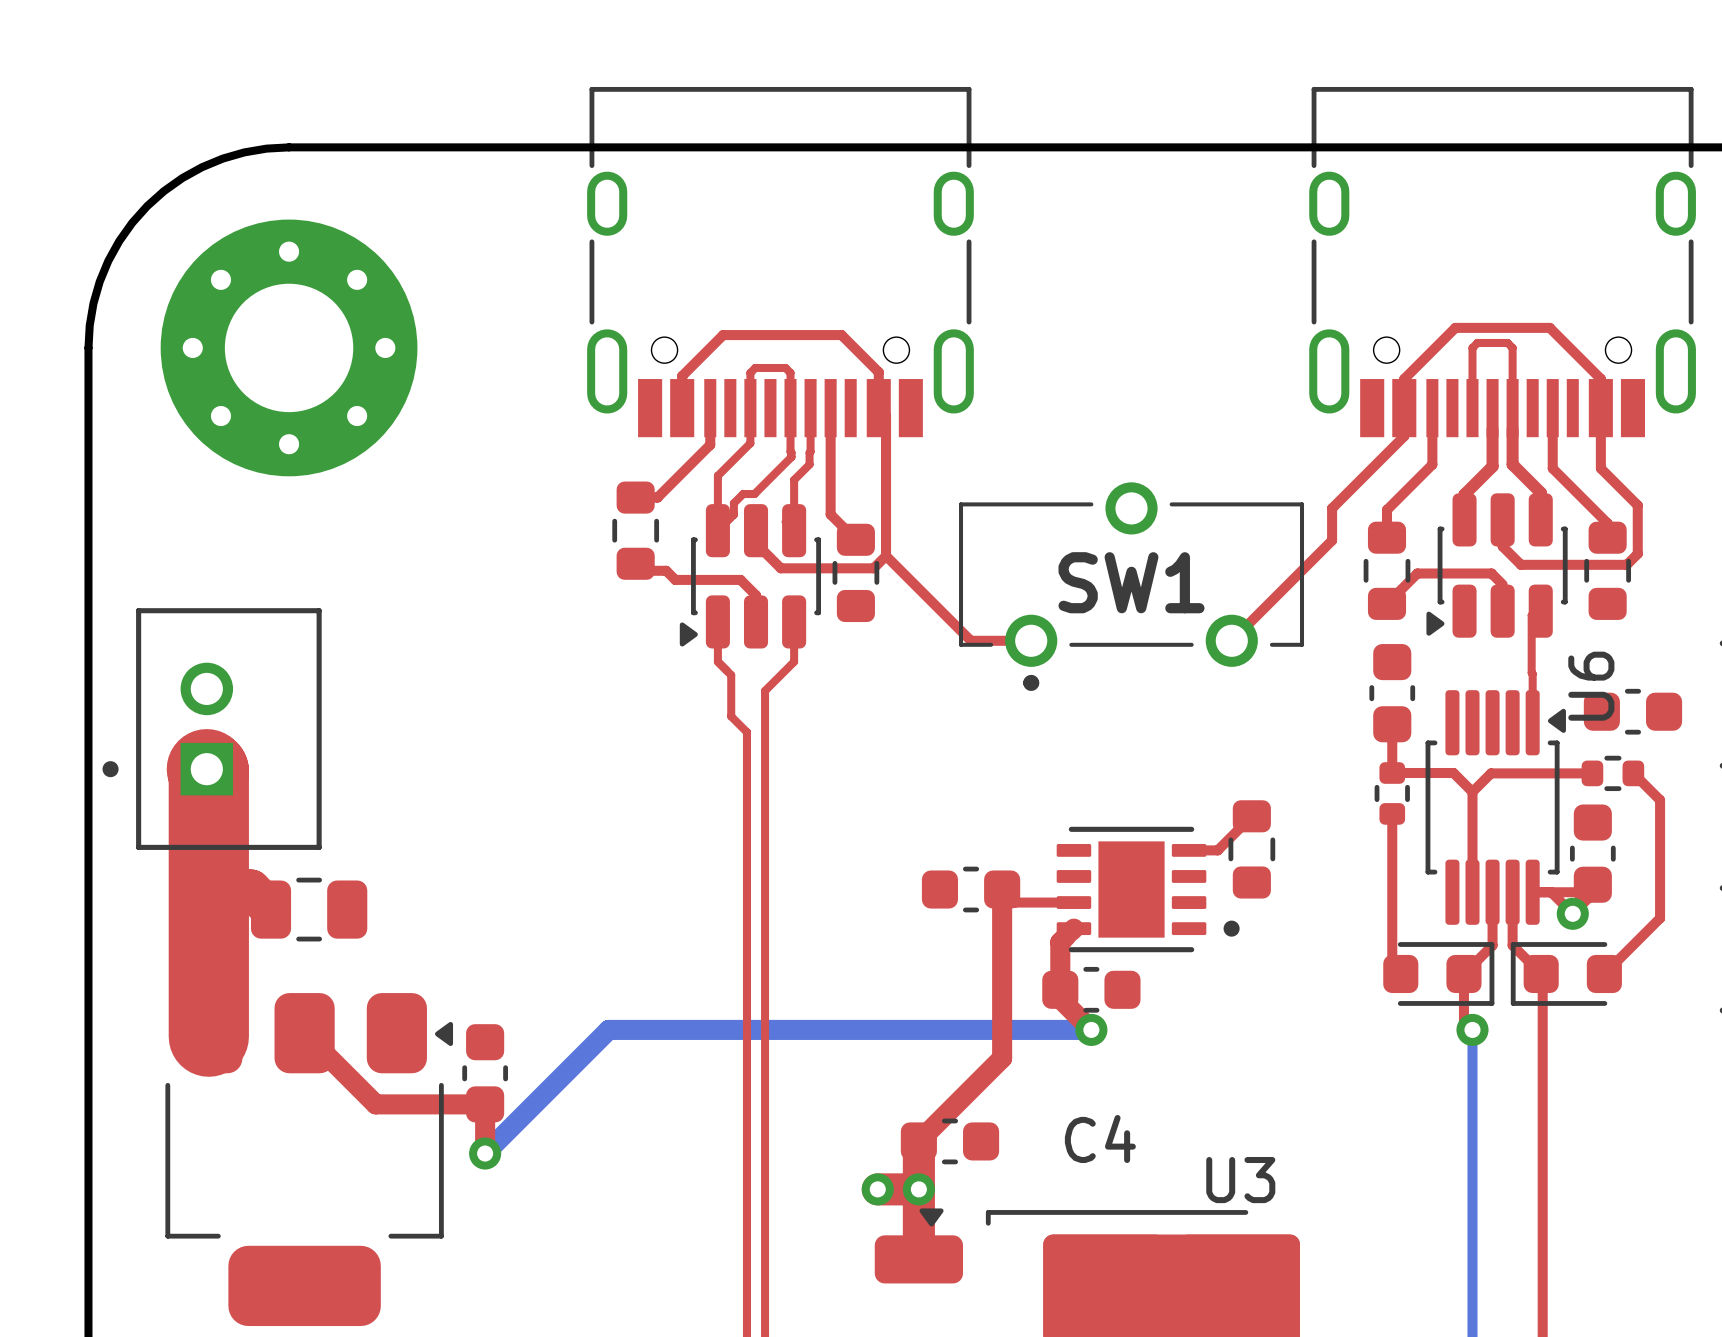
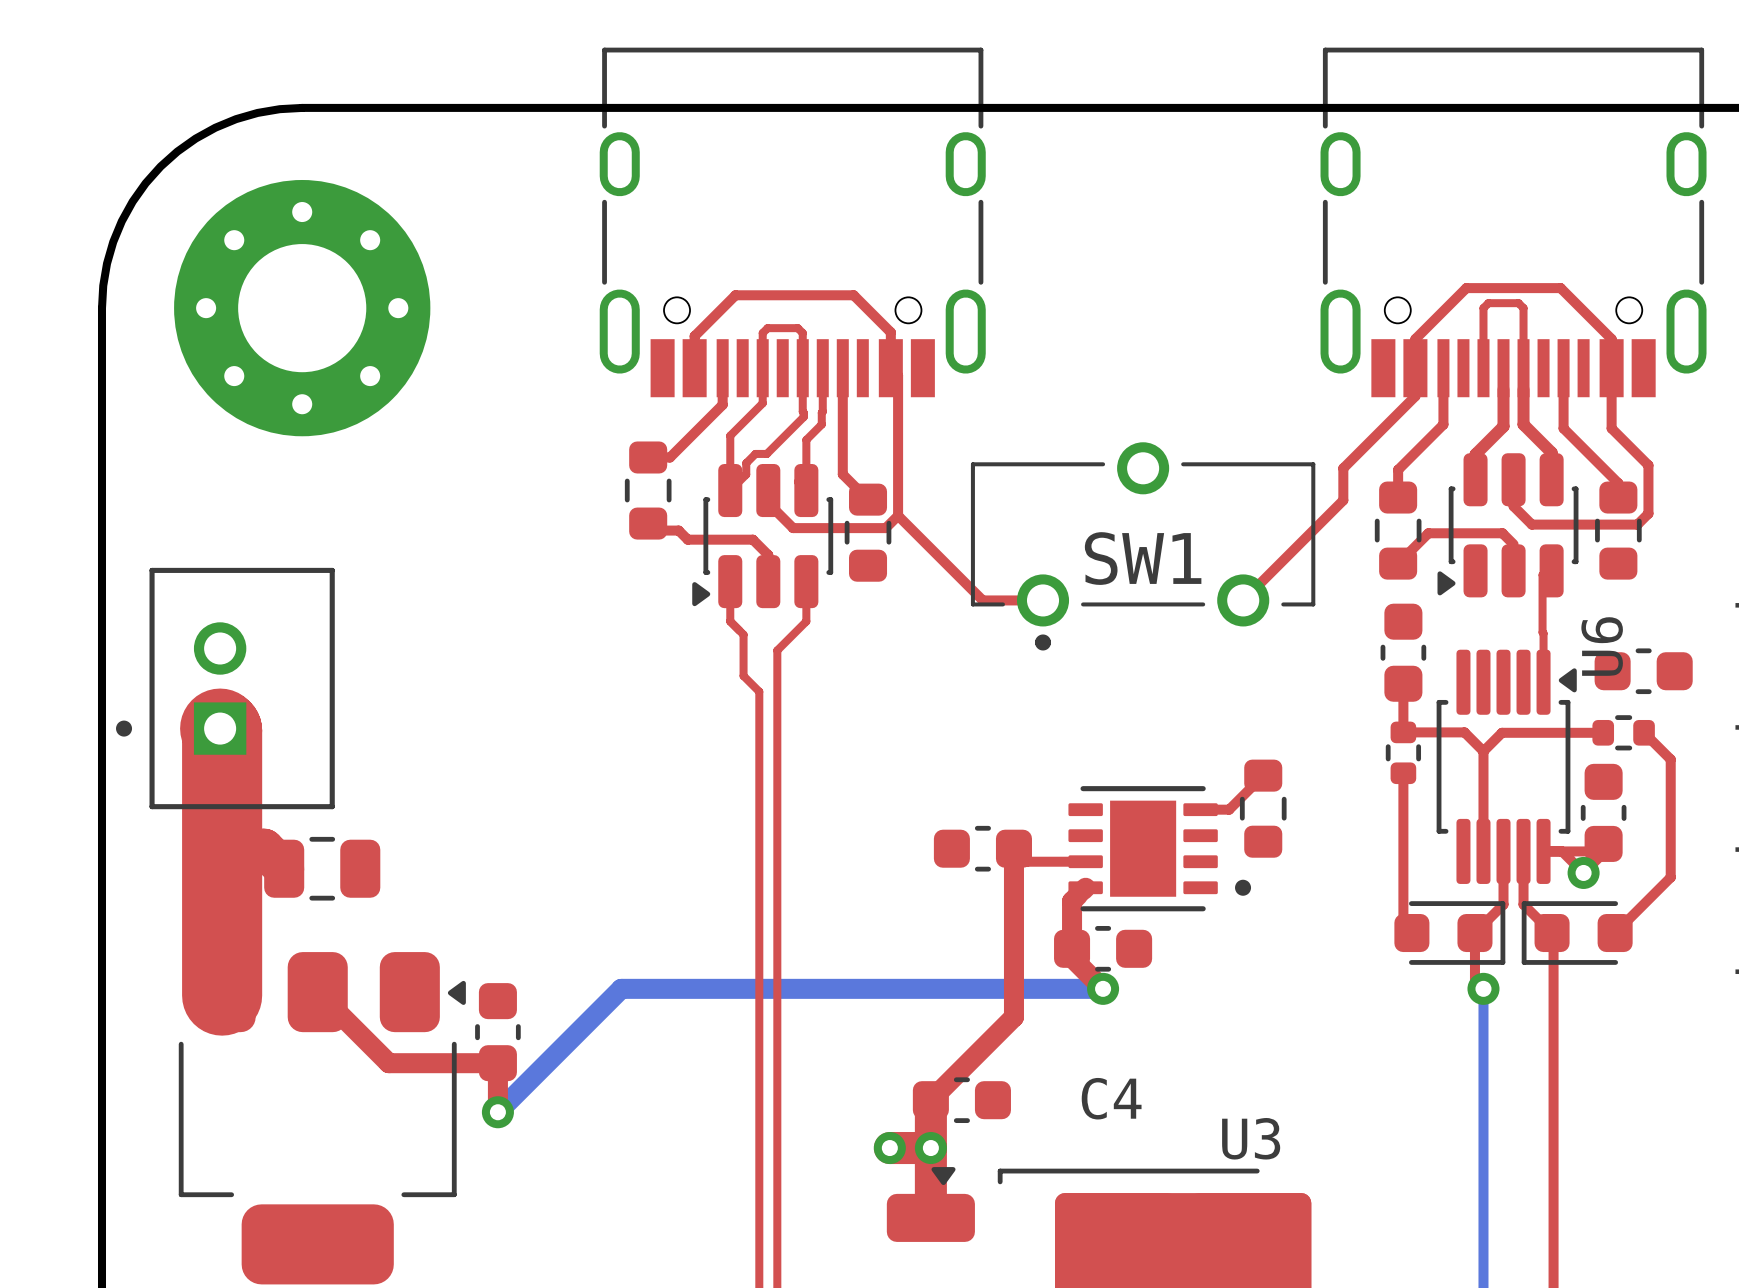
SW1 name position: SW1 (1131, 582) -> SW1 (1143, 558)

